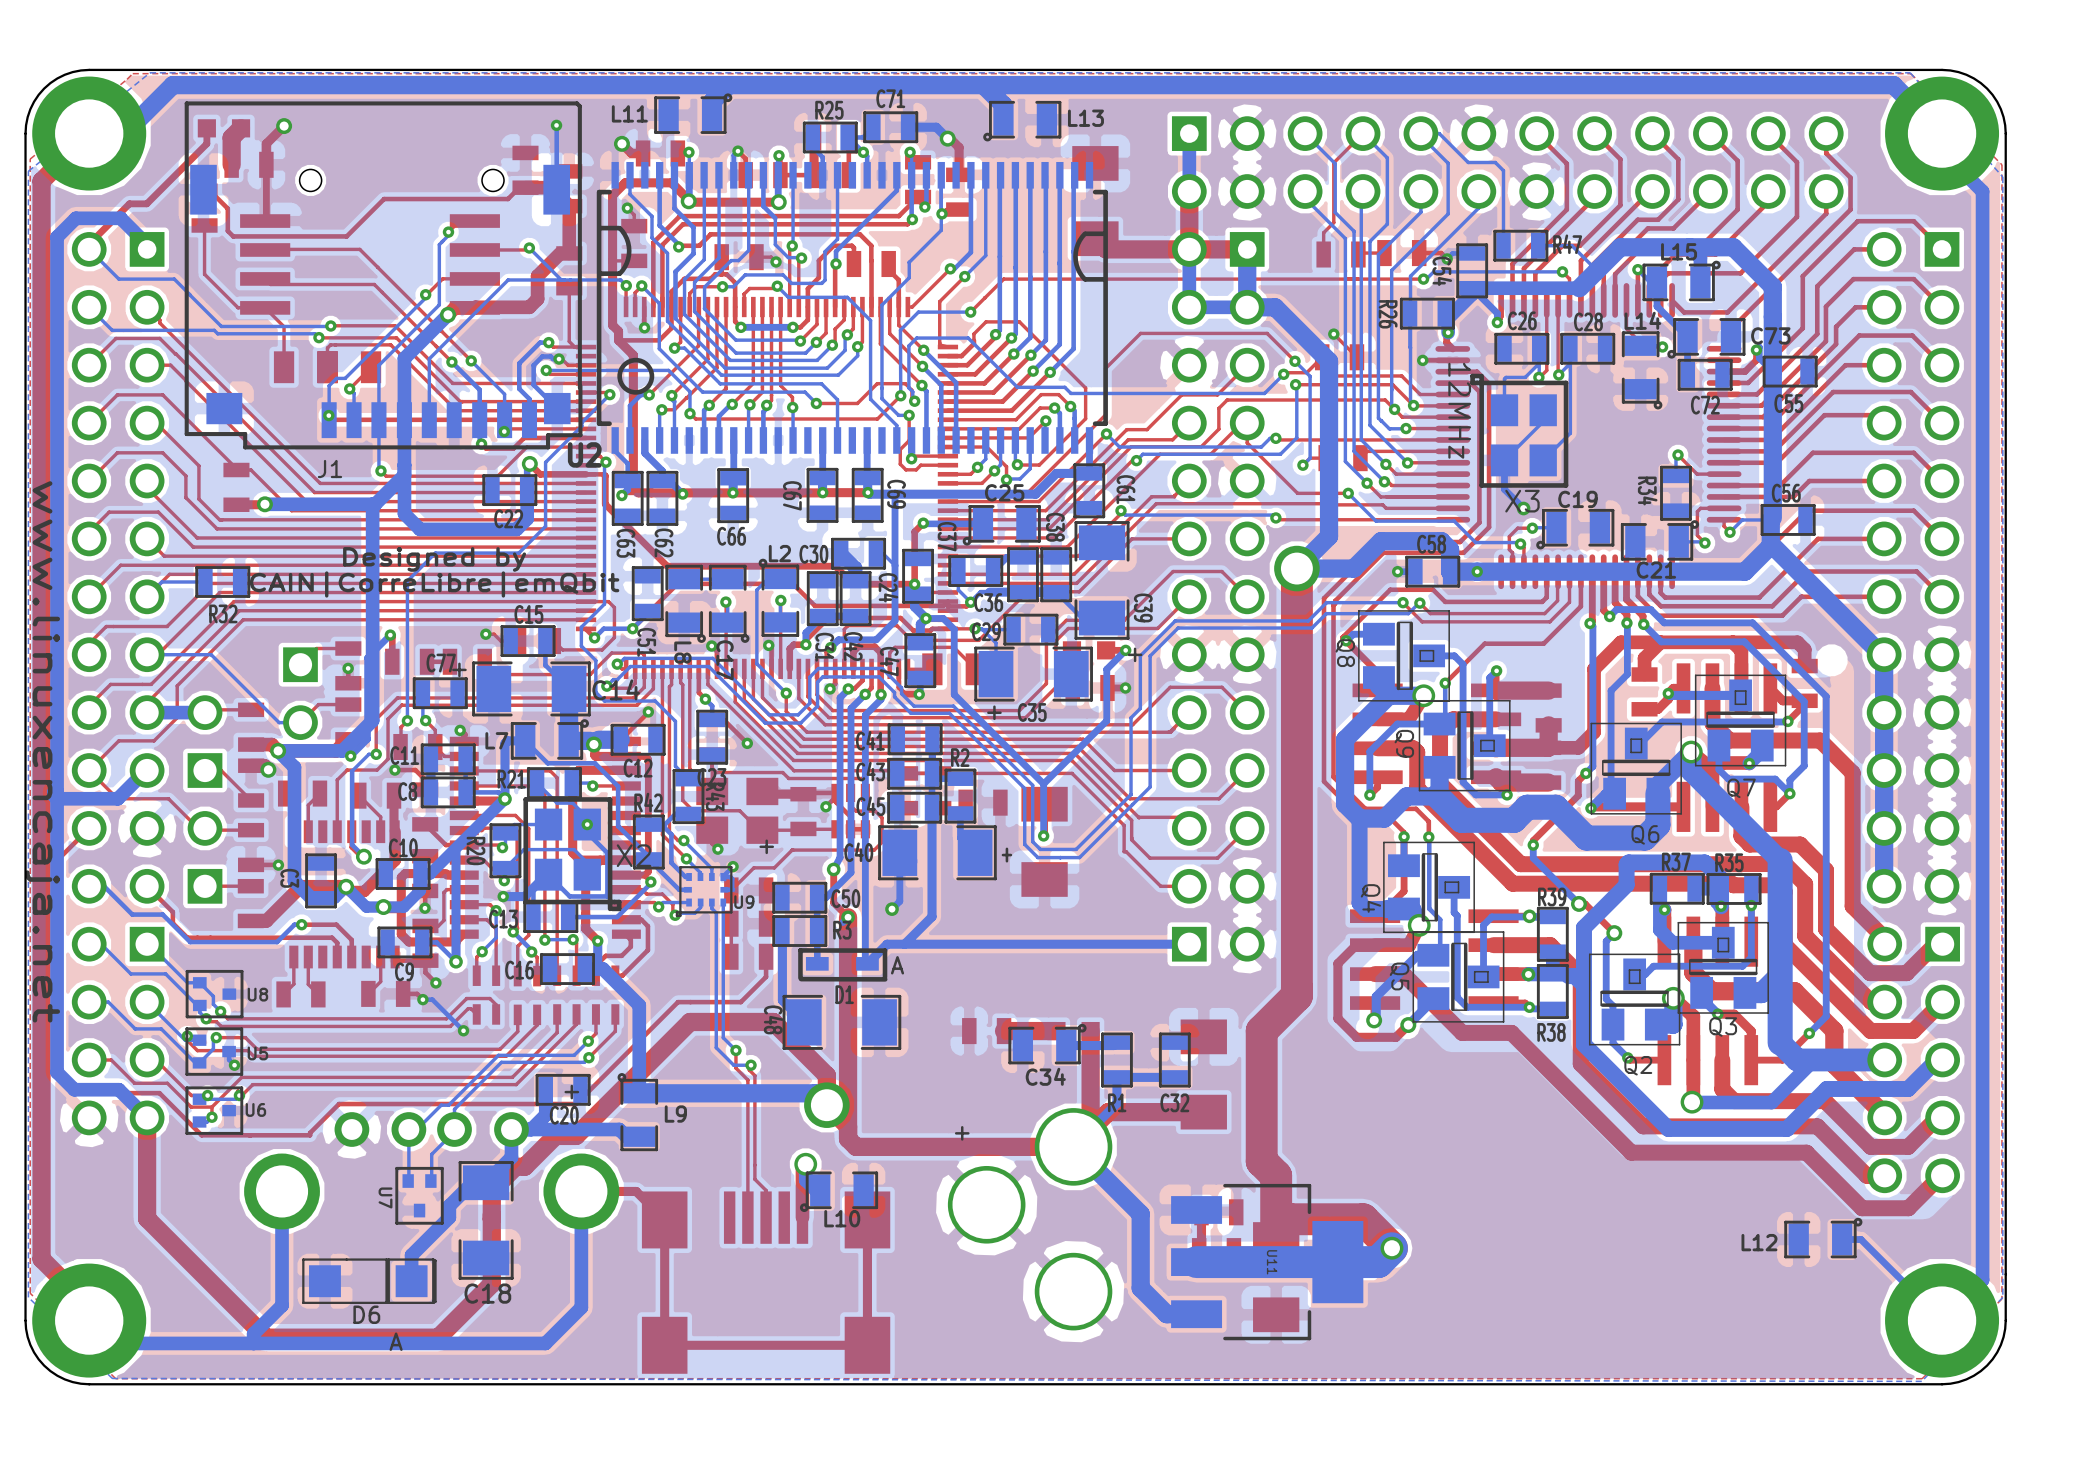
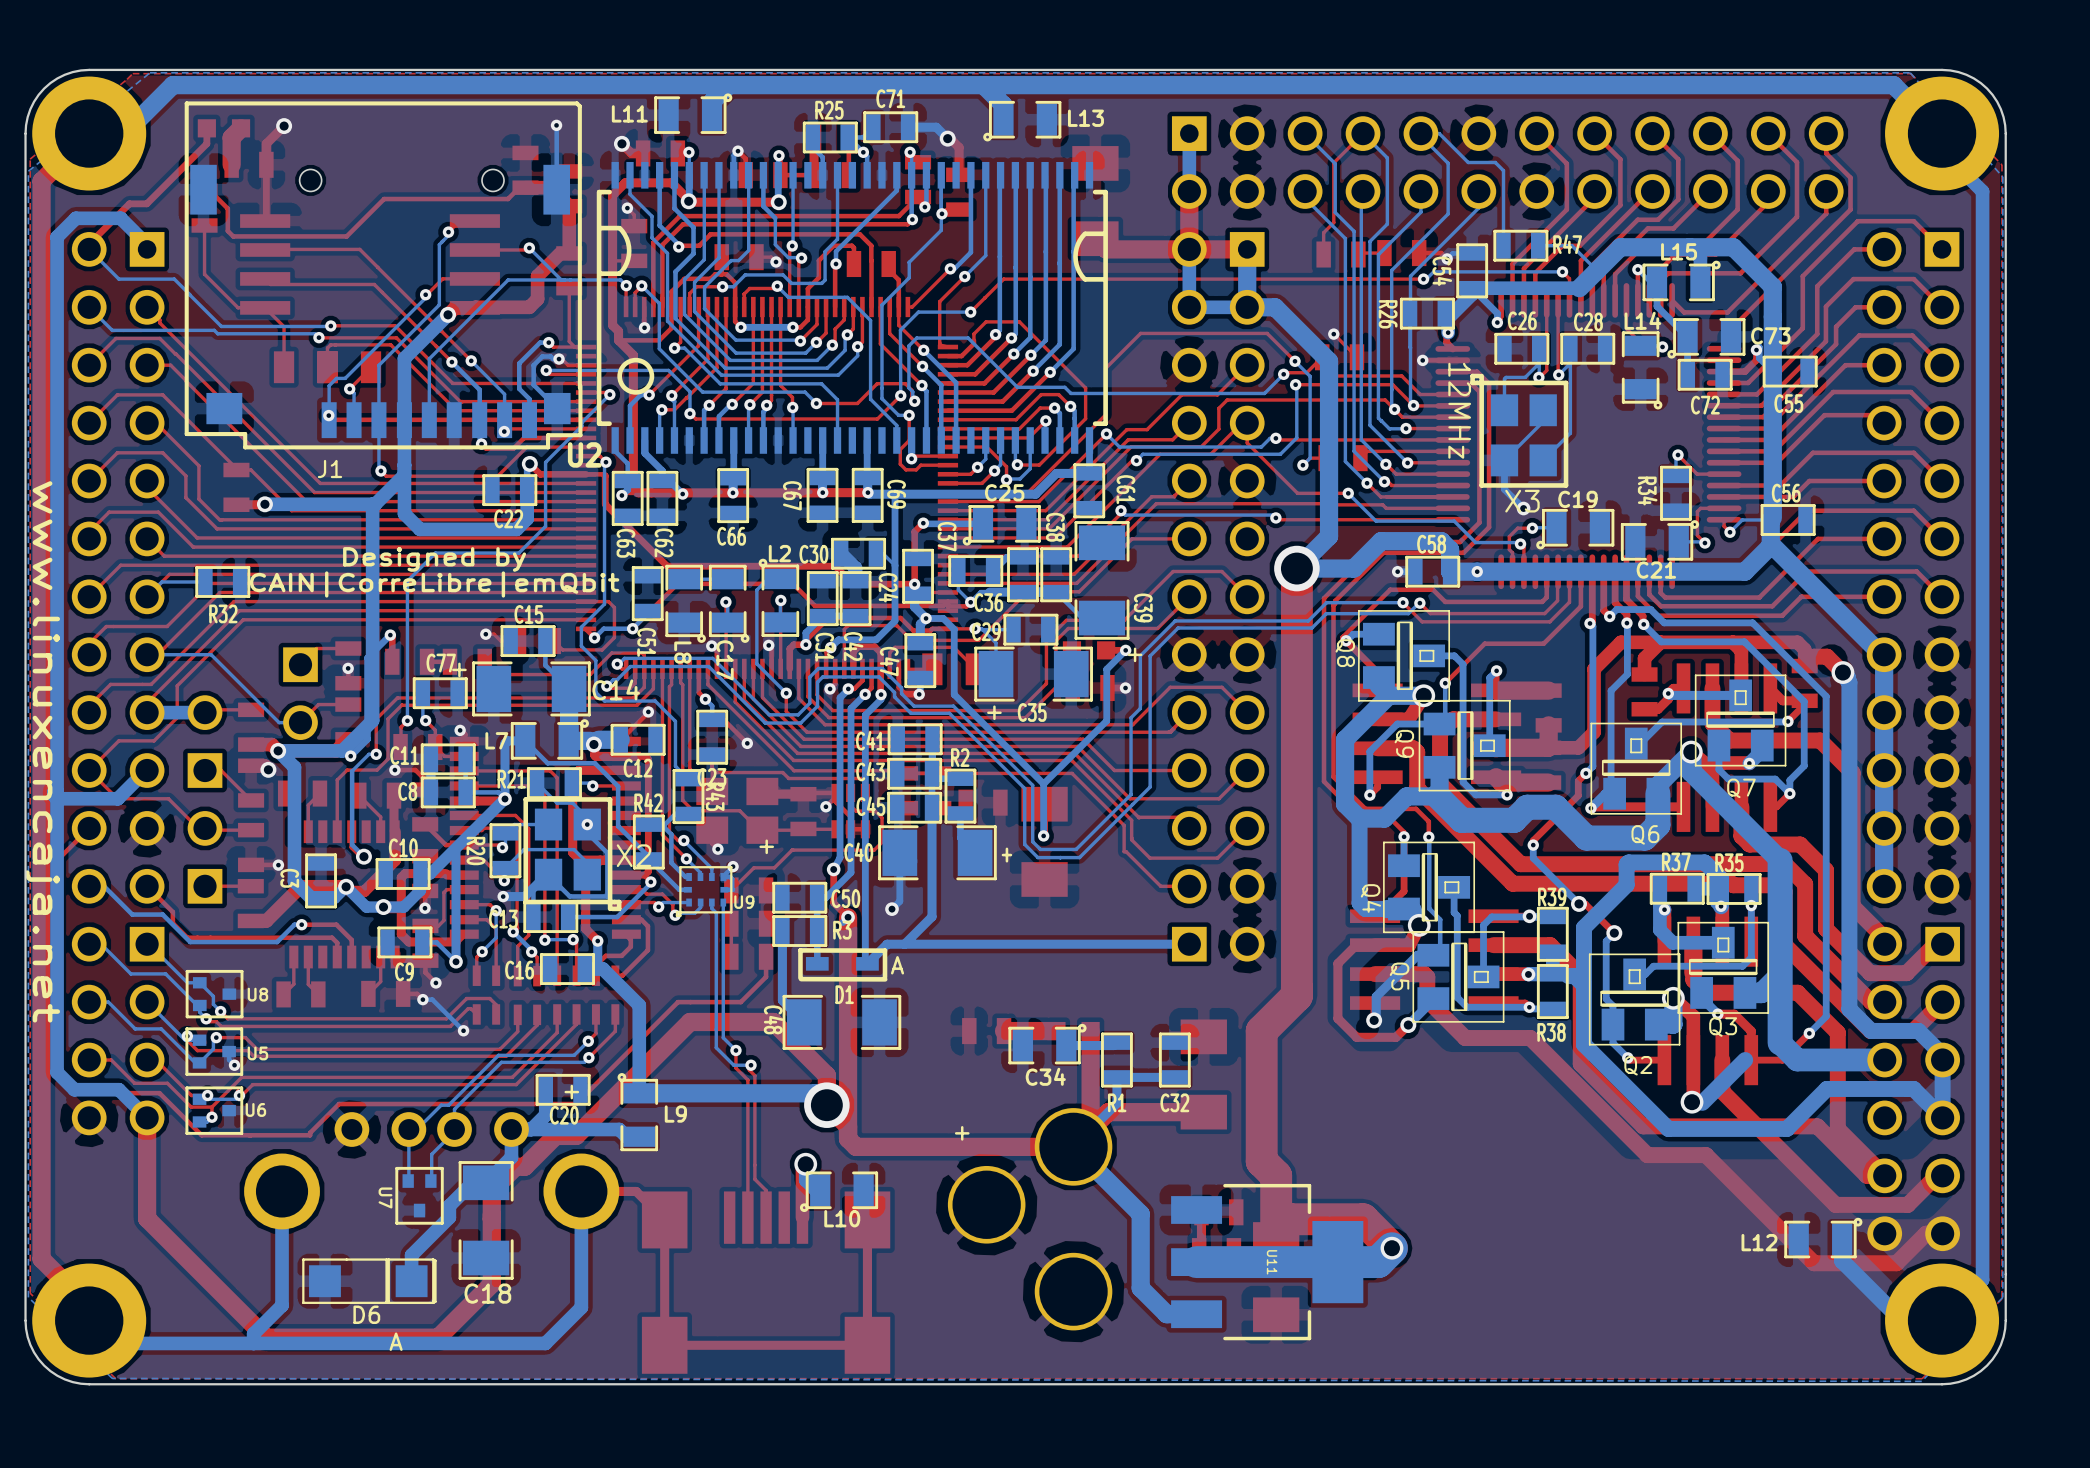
top track: none -> (1804, 666) (1814, 656) (1827, 656) (1842, 672)
via: none -> (1842, 672)
top track: (1693, 972) (1711, 991) (1794, 991) (1834, 1030) (1834, 1064) (1884, 1115) -> (1693, 972) (1693, 980) (1706, 992) (1797, 992) (1837, 1032) (1837, 1128) (1884, 1175)
top track: (1403, 974) (1462, 1032) (1511, 1032) (1631, 1152) (1806, 1152) (1862, 1208) (1908, 1208) (1940, 1175) -> (1403, 974) (1424, 974) (1427, 977) (1427, 1000) (1465, 1038) (1530, 1038) (1647, 1155) (1705, 1155) (1814, 1263) (1896, 1263) (1926, 1233) (1942, 1233)
bottom track: (1814, 1059) (1771, 1102) (1692, 1102) -> none
part: (1913, 1059) -> none
bottom track: (1937, 1059) (1908, 1088) -> (1842, 672) (1849, 682) (1849, 1009) (1871, 1030) (1918, 1030) (1942, 1055) (1942, 1117) (1913, 1088) (1908, 1088)
bottom track: none -> (1745, 1060) (1702, 1102)
part: none -> (1913, 1088)
top track: (1722, 1089) (1734, 1101) (1825, 1101) (1870, 1146) (1908, 1146) (1937, 1117) (1942, 1117) -> (1722, 1089) (1722, 1091) (1835, 1204) (1907, 1204) (1936, 1175) (1940, 1175)
bottom track: (1842, 1239) (1860, 1239) (1942, 1320) -> (1842, 1239) (1842, 1260) (1901, 1320) (1942, 1320)

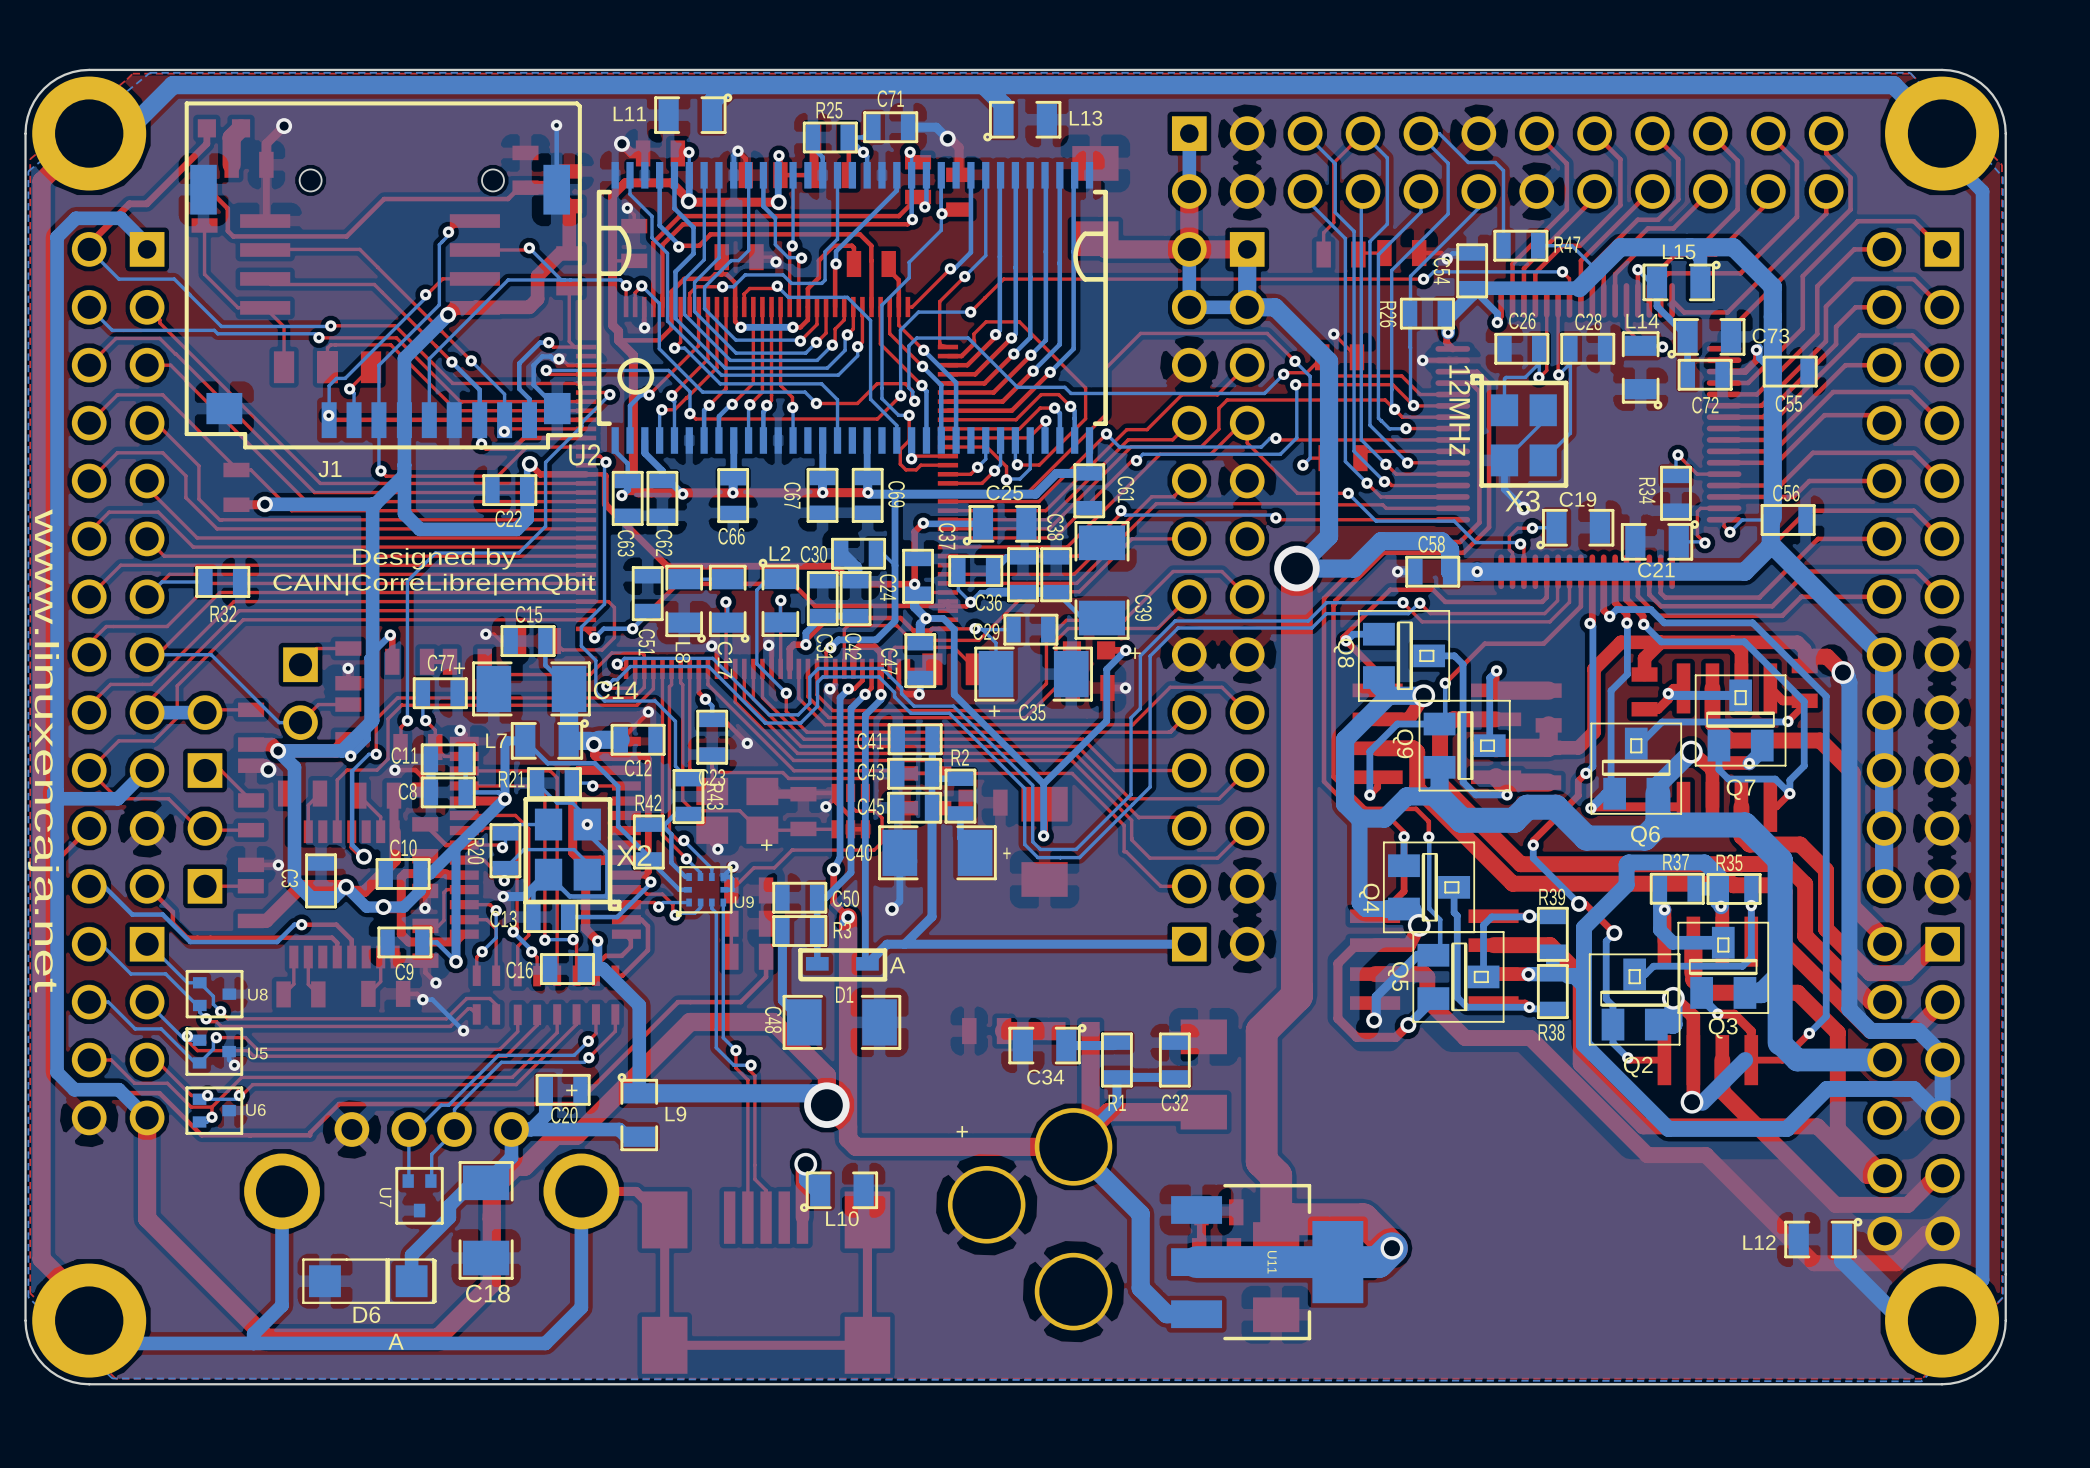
bottom track: (1691, 752) (1691, 771) (1780, 860) -> (1657, 825) (1745, 825) (1780, 860)

